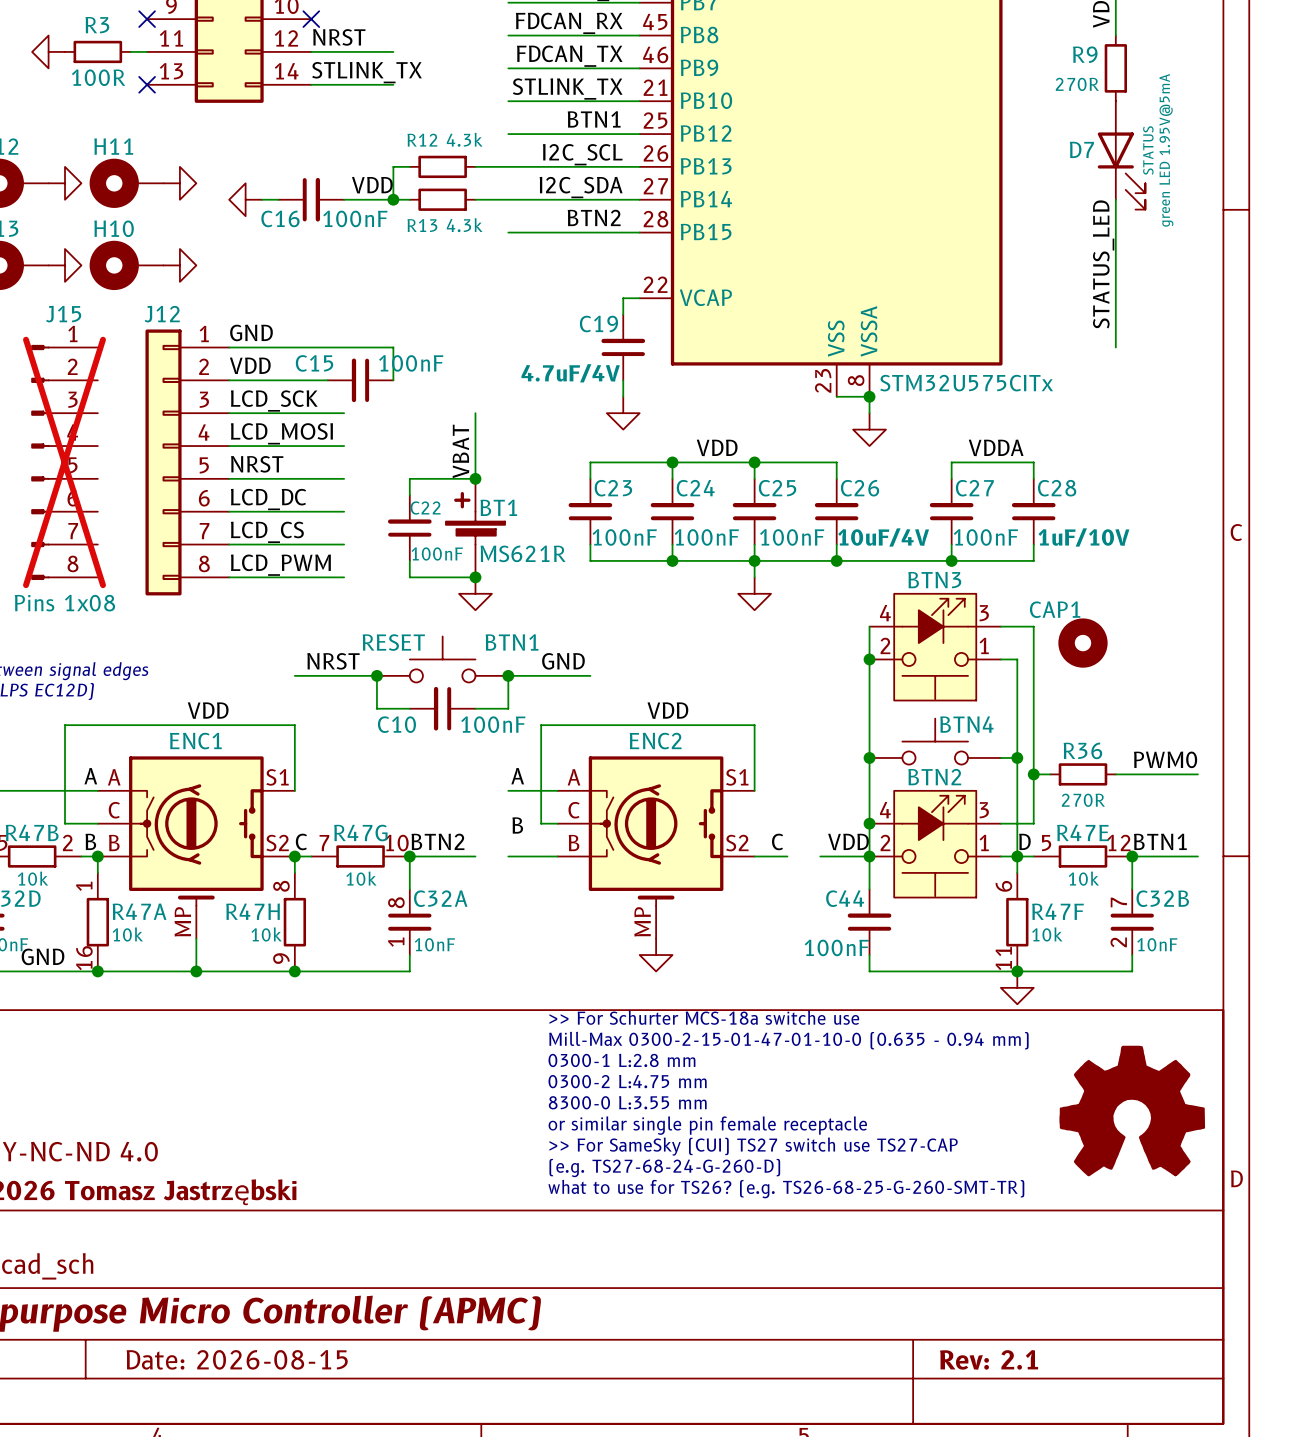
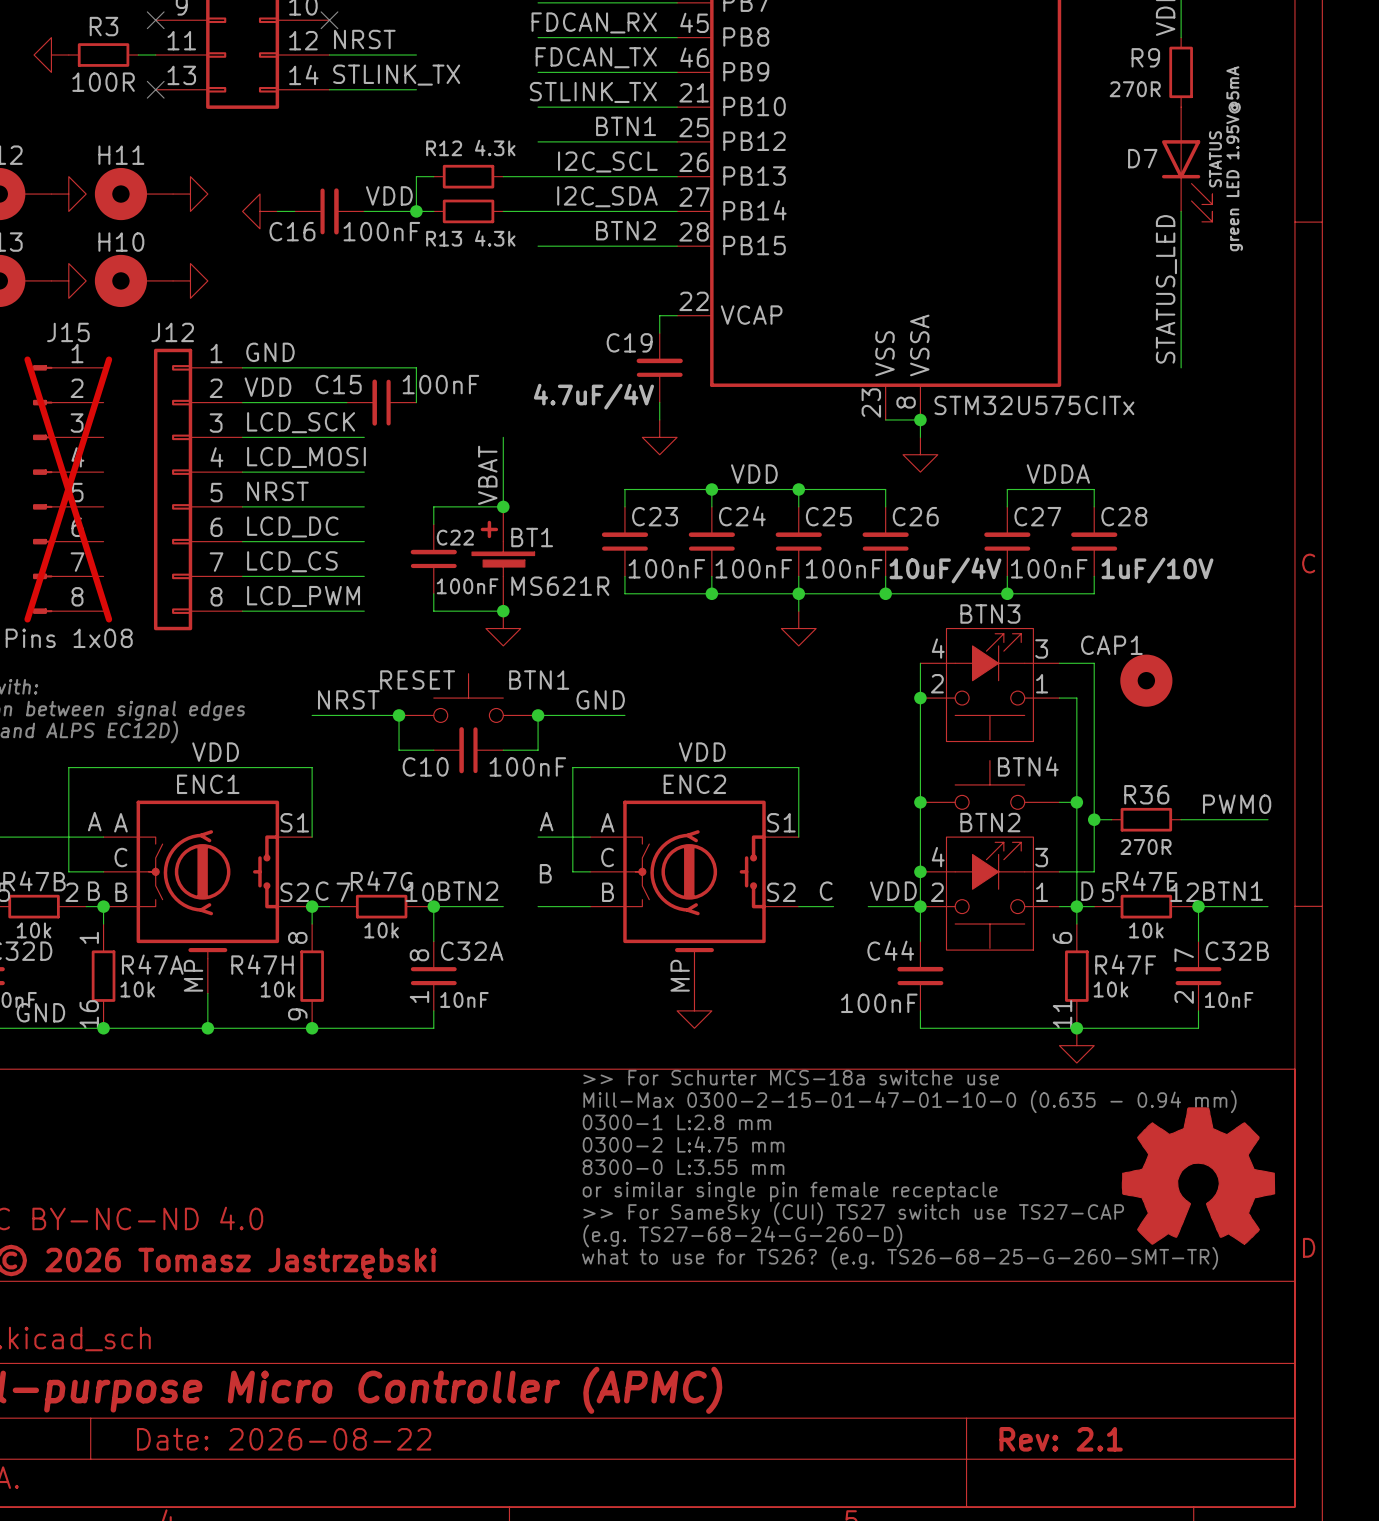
title block: Date: 2026-08-15 (237, 1359) -> Date: 2026-08-22 (284, 1439)

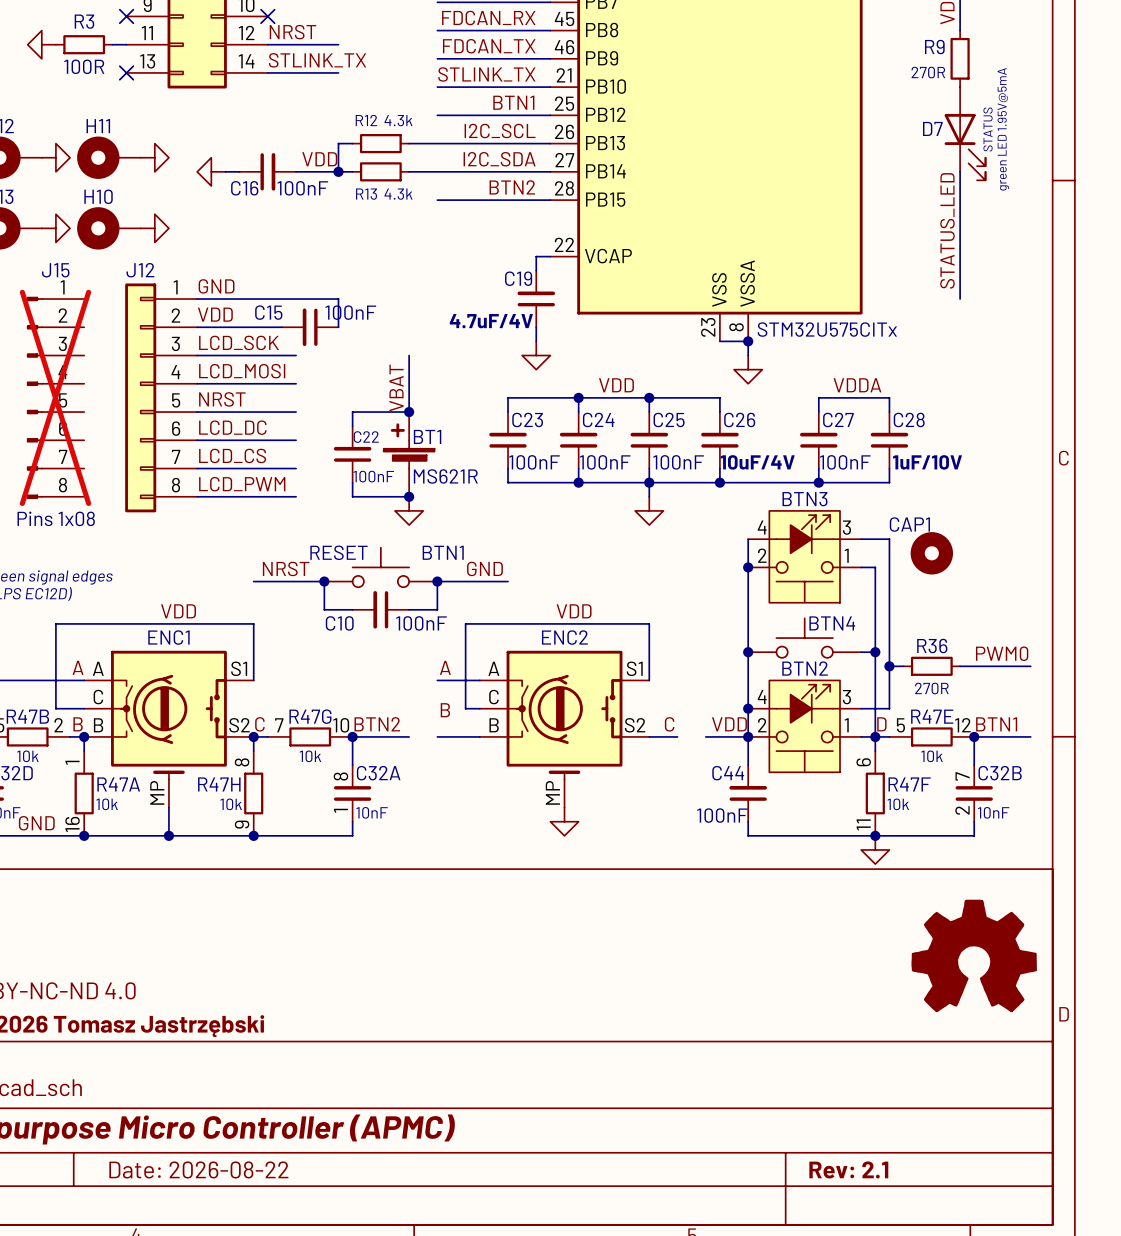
text: >> For Schurter MCS-18a switche use (791, 1077) -> none
text: Mill-Max 0300-2-15-01-47-01-10-0 (0.635 - 0.94 mm) (909, 1101) -> none
text: 0300-1 L:2.8 mm (676, 1122) -> none
text: 0300-2 L:4.75 mm (683, 1144) -> none
text: 8300-0 L:3.55 mm (683, 1167) -> none
text: or similar single pin female receptacle (790, 1191) -> none
text: >> For SameSky (CUI) TS27 switch use TS27-CAP (853, 1213) -> none
text: (e.g. TS27-68-24-G-260-D) (742, 1236) -> none
text: what to use for TS26? (e.g. TS26-68-25-G-260-SMT-TR) (900, 1258) -> none

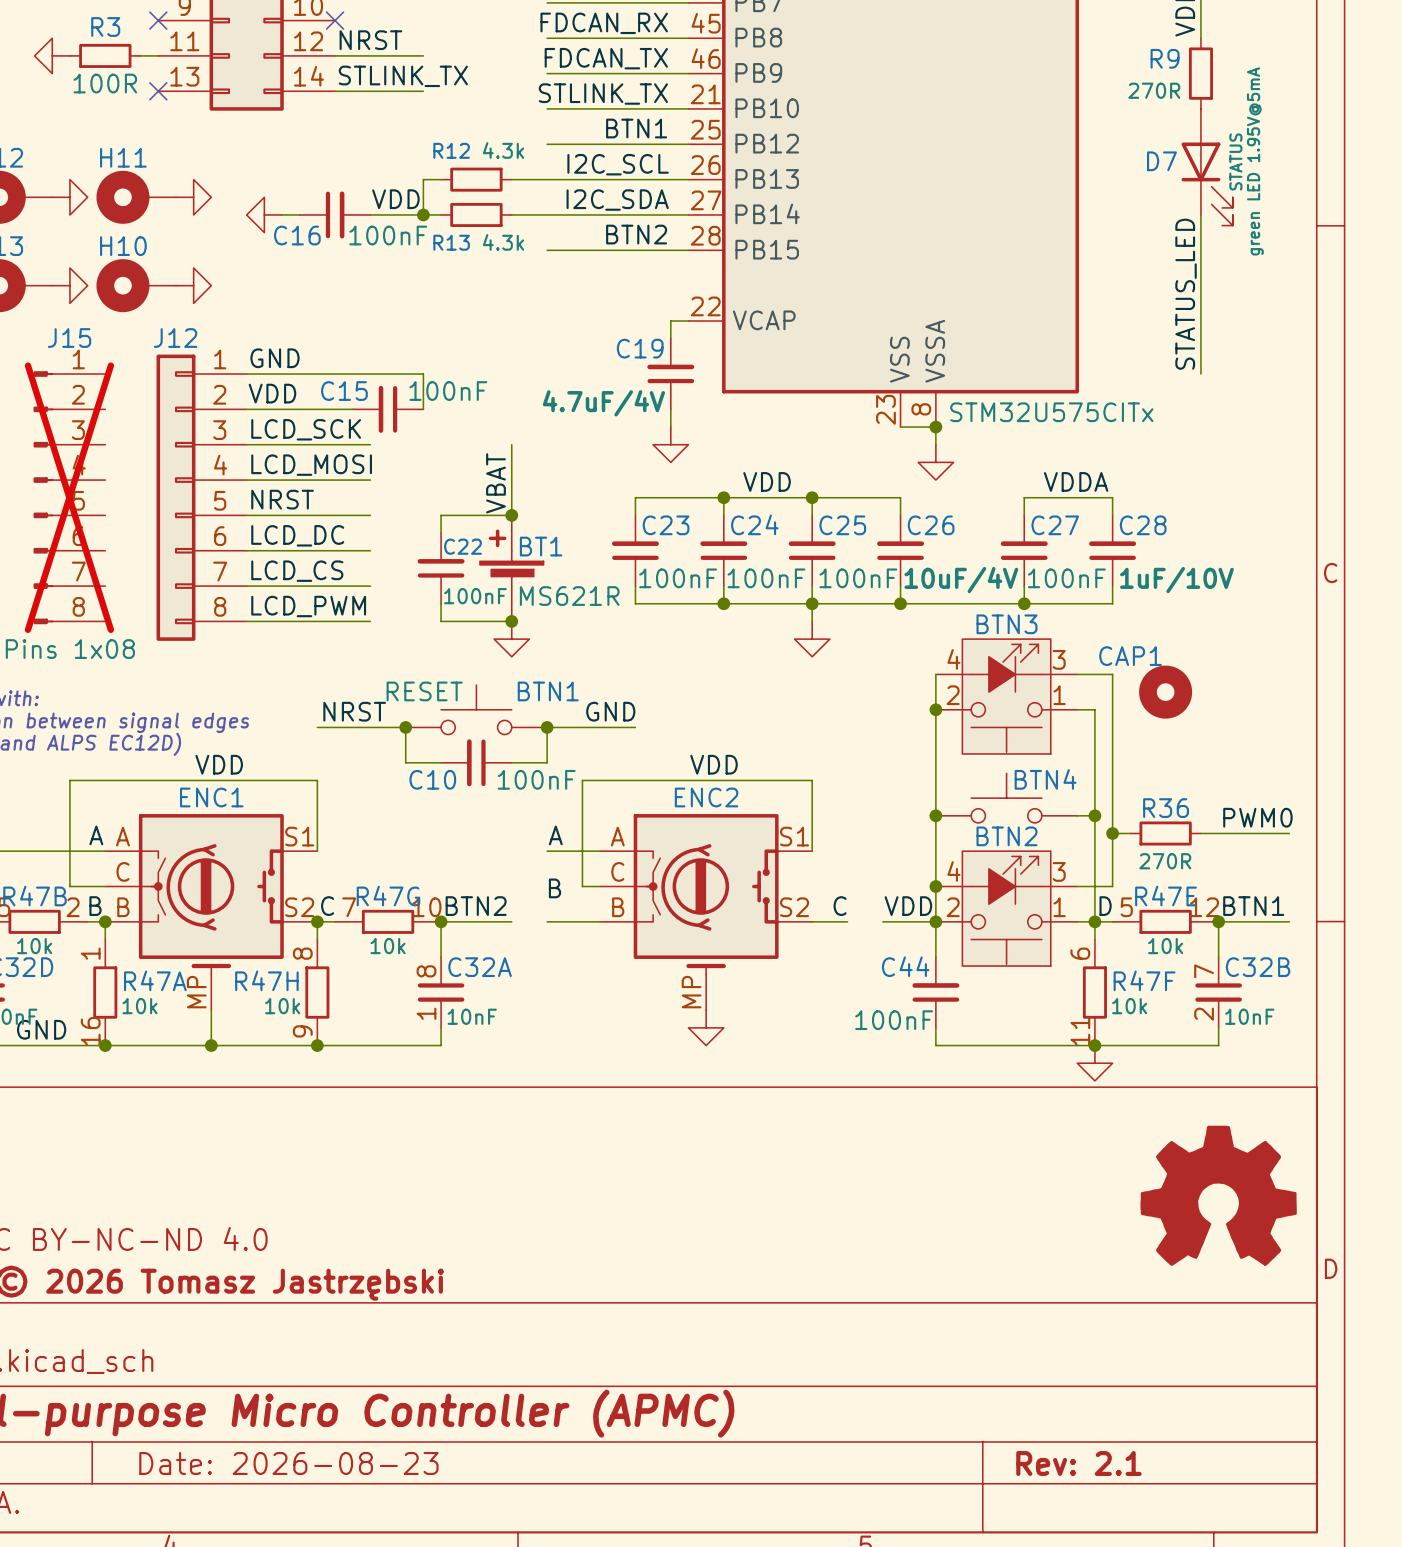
title block: Date: 2026-08-22 (198, 1169) -> Date: 2026-08-23 (288, 1463)

